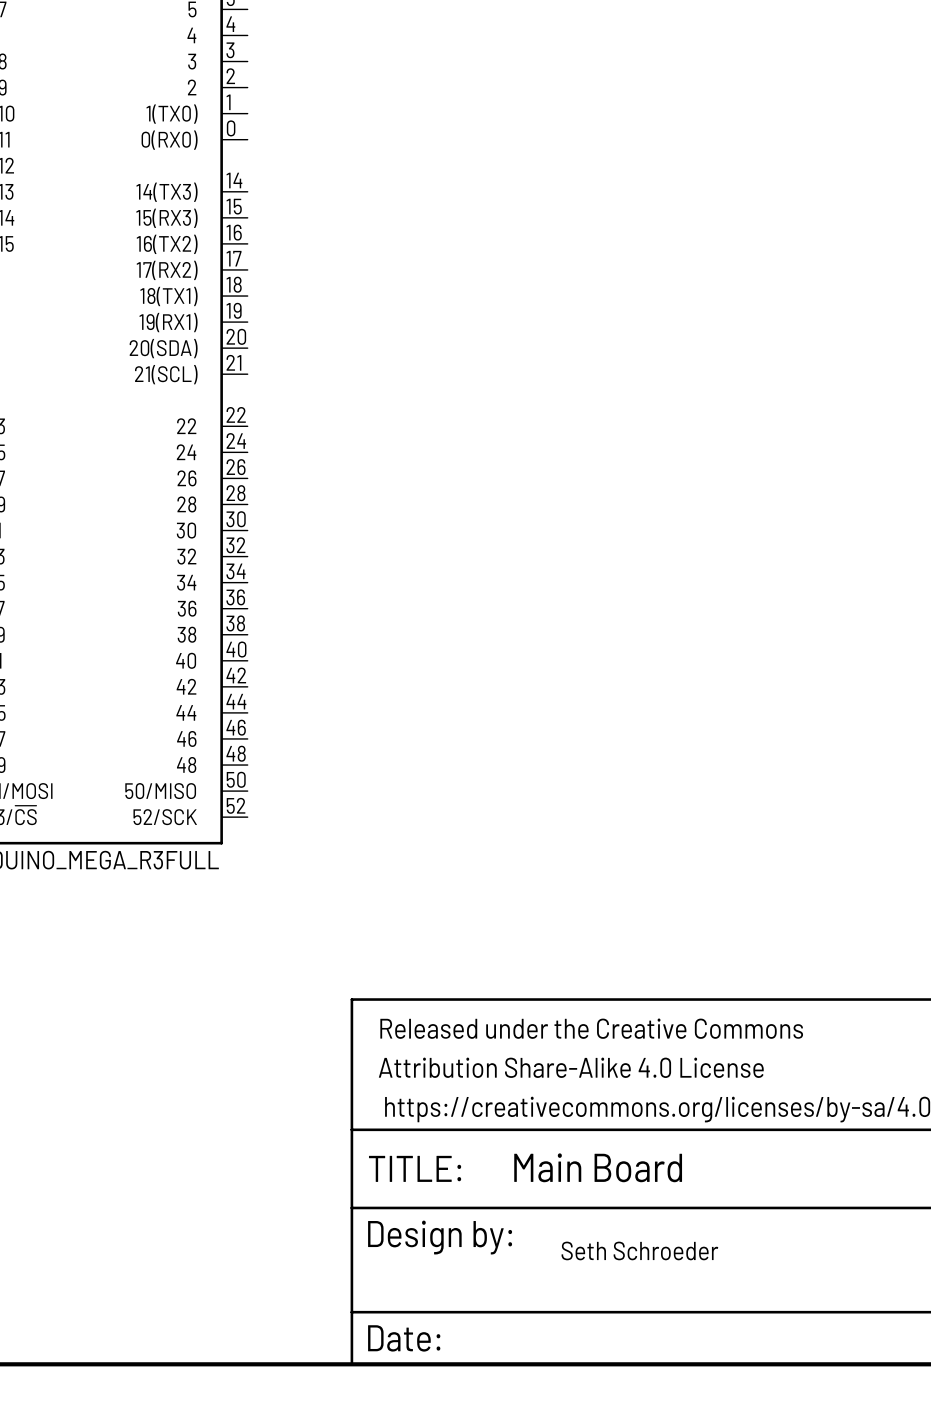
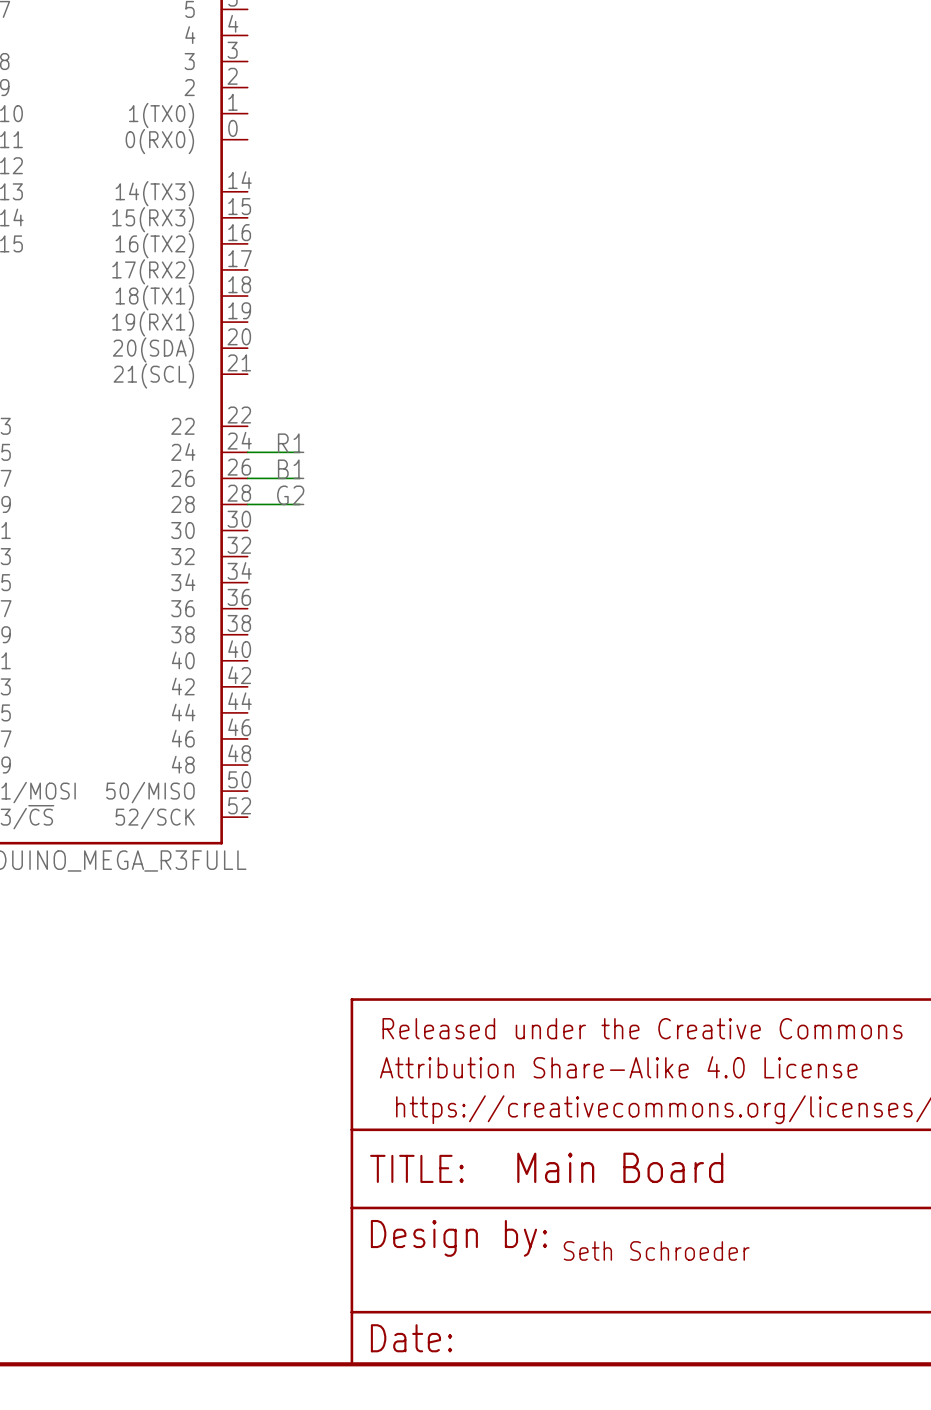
label: none -> R1 (291, 443)
wire: none -> (247, 452) (299, 452)
label: none -> B1 (291, 469)
wire: none -> (247, 478) (299, 478)
label: none -> G2 (290, 495)
wire: none -> (247, 504) (299, 504)

